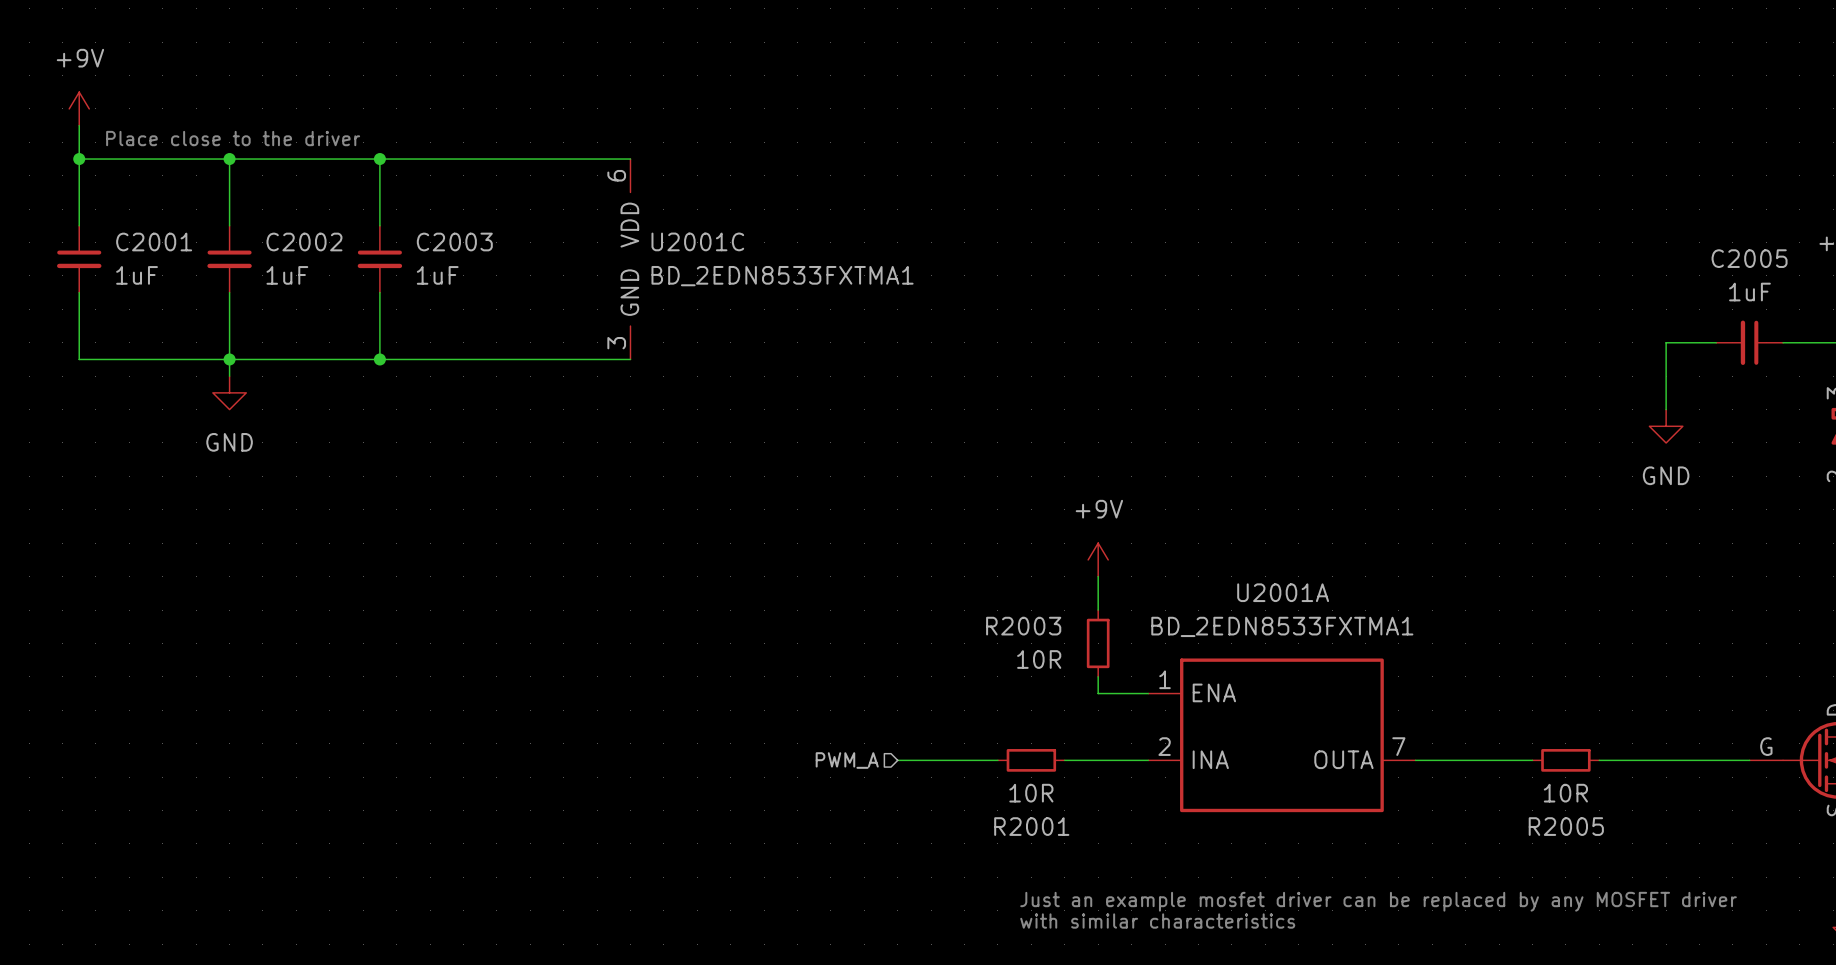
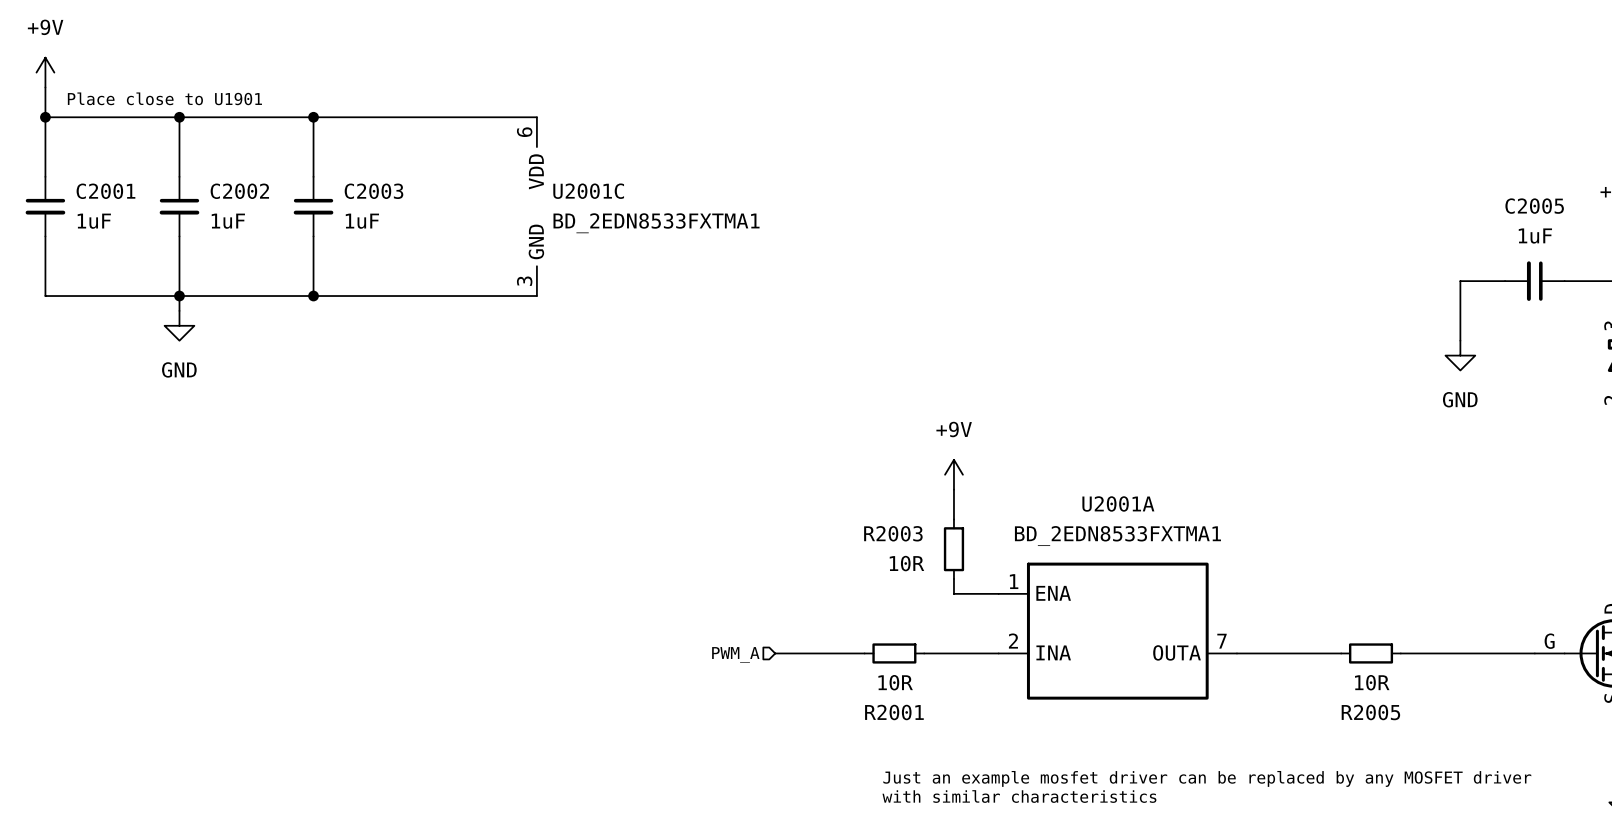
text: Place close to the driver (233, 138) -> Place close to U1901 (164, 98)

